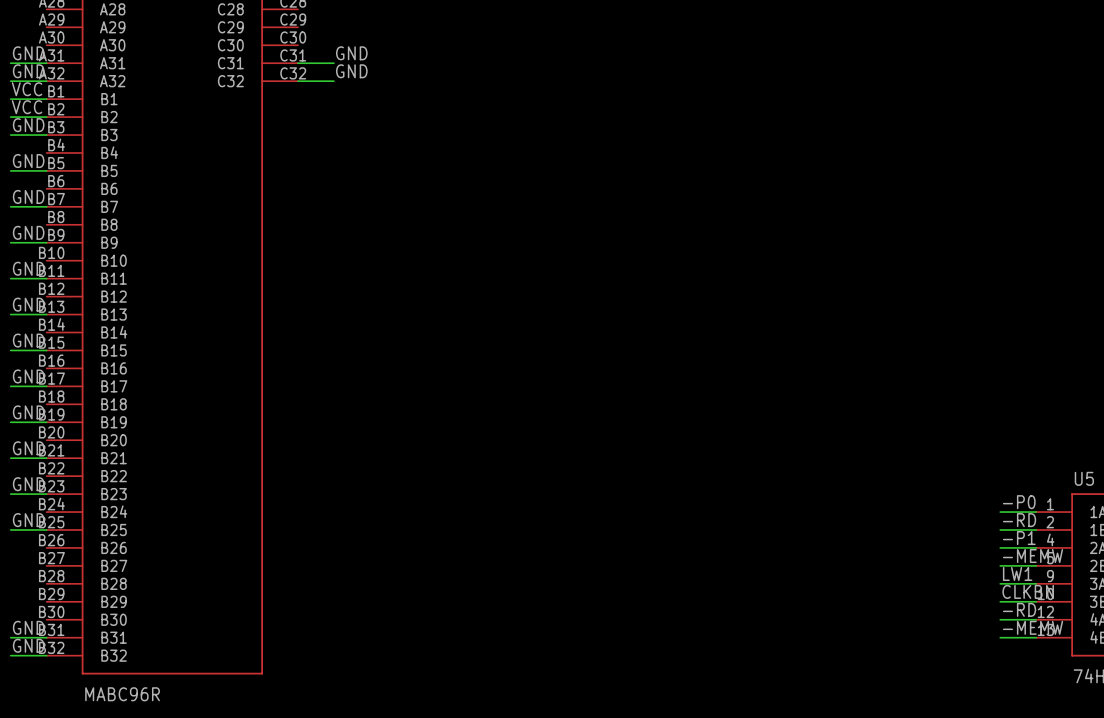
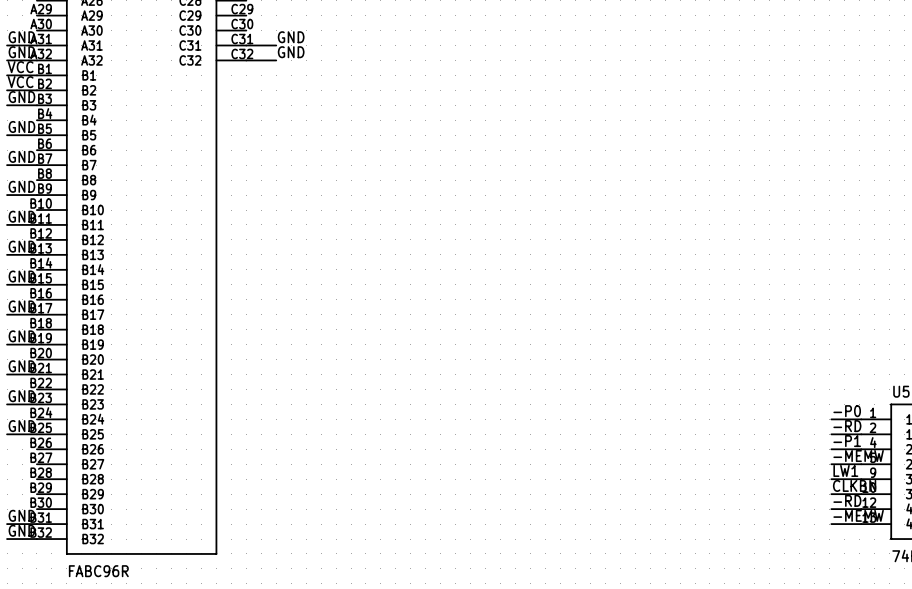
part value: MABC96R (122, 694) -> FABC96R (98, 571)

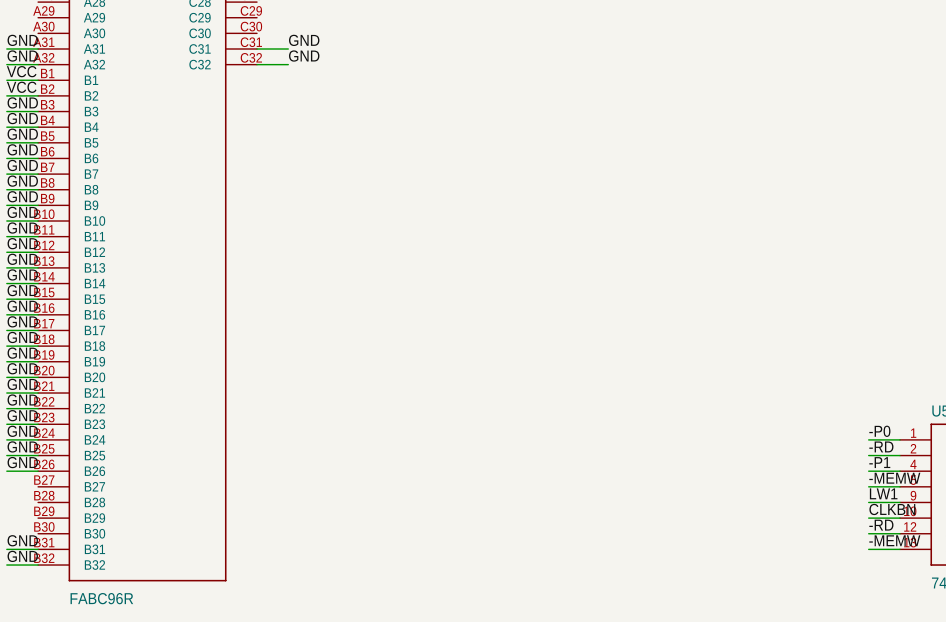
label: none -> GND (22, 118)
wire: none -> (6, 127) (38, 127)
label: none -> GND (22, 149)
wire: none -> (6, 158) (38, 158)
label: none -> GND (22, 181)
wire: none -> (6, 189) (38, 189)
label: none -> GND (22, 212)
wire: none -> (6, 221) (38, 221)
label: none -> GND (22, 243)
wire: none -> (6, 252) (38, 252)
label: none -> GND (22, 274)
wire: none -> (6, 283) (38, 283)
label: none -> GND (22, 306)
wire: none -> (6, 314) (38, 314)
label: none -> GND (22, 337)
wire: none -> (6, 346) (38, 346)
label: none -> GND (22, 368)
wire: none -> (6, 377) (38, 377)
label: none -> GND (22, 400)
wire: none -> (6, 408) (38, 408)
label: none -> GND (22, 431)
wire: none -> (6, 439) (38, 439)
label: none -> GND (22, 462)
wire: none -> (6, 471) (38, 471)

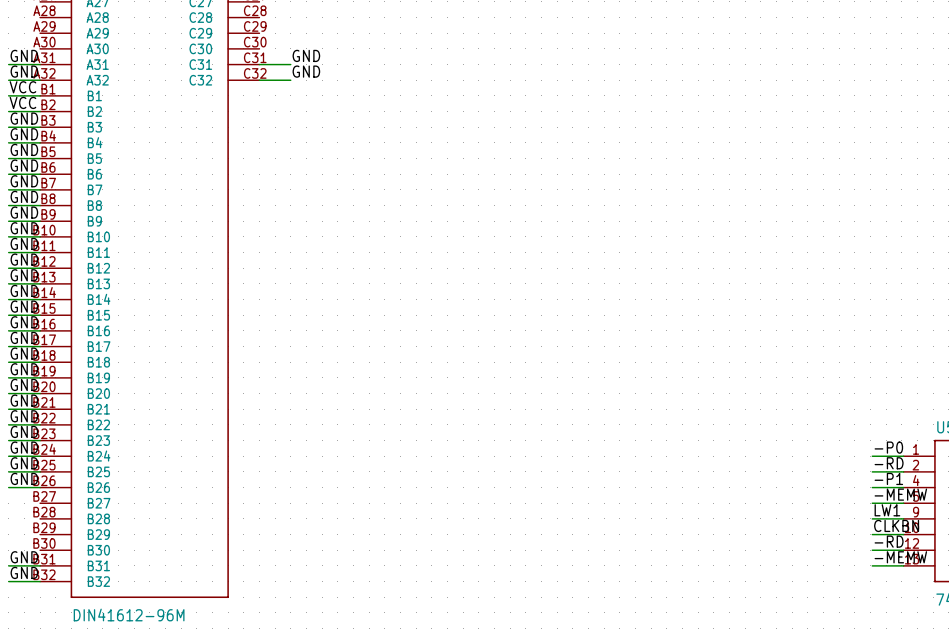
part value: FABC96R (101, 598) -> DIN41612-96M (129, 615)

